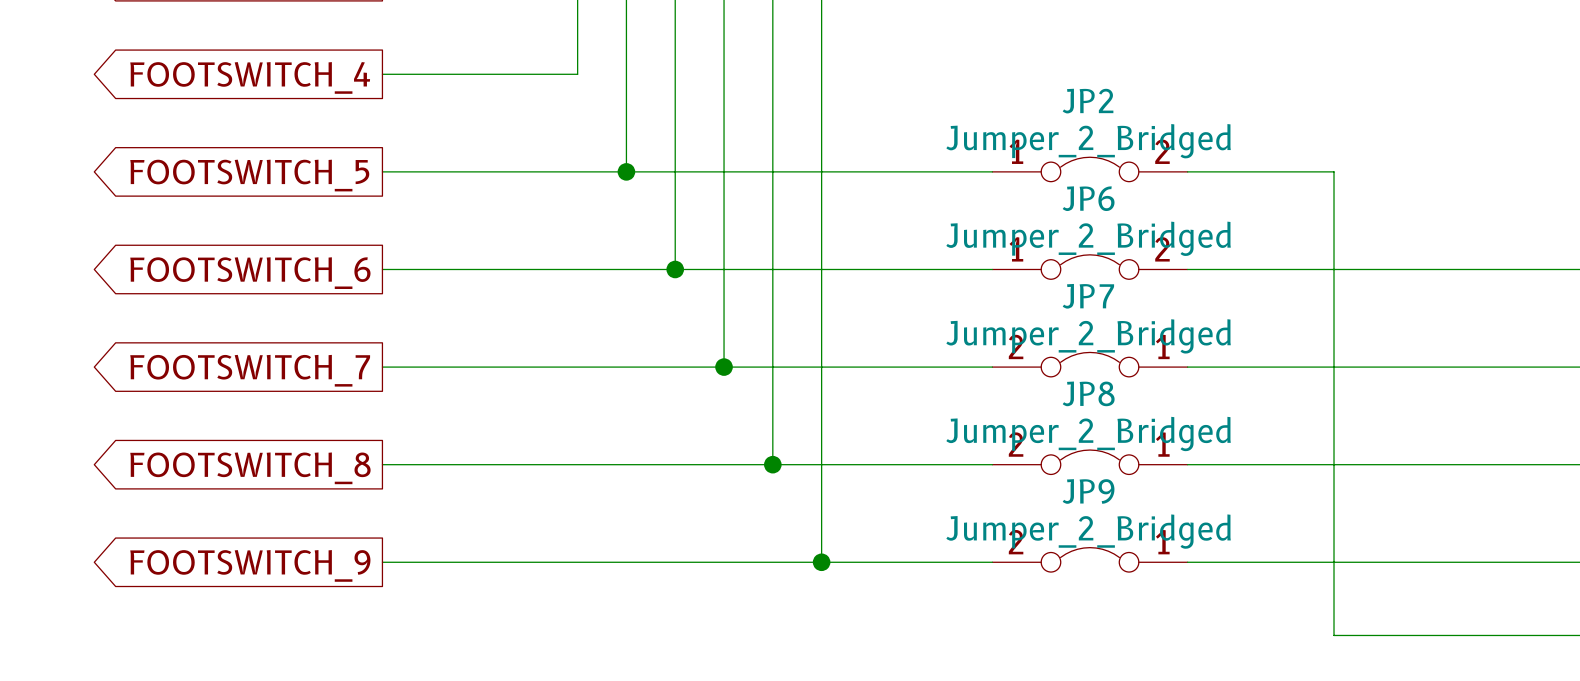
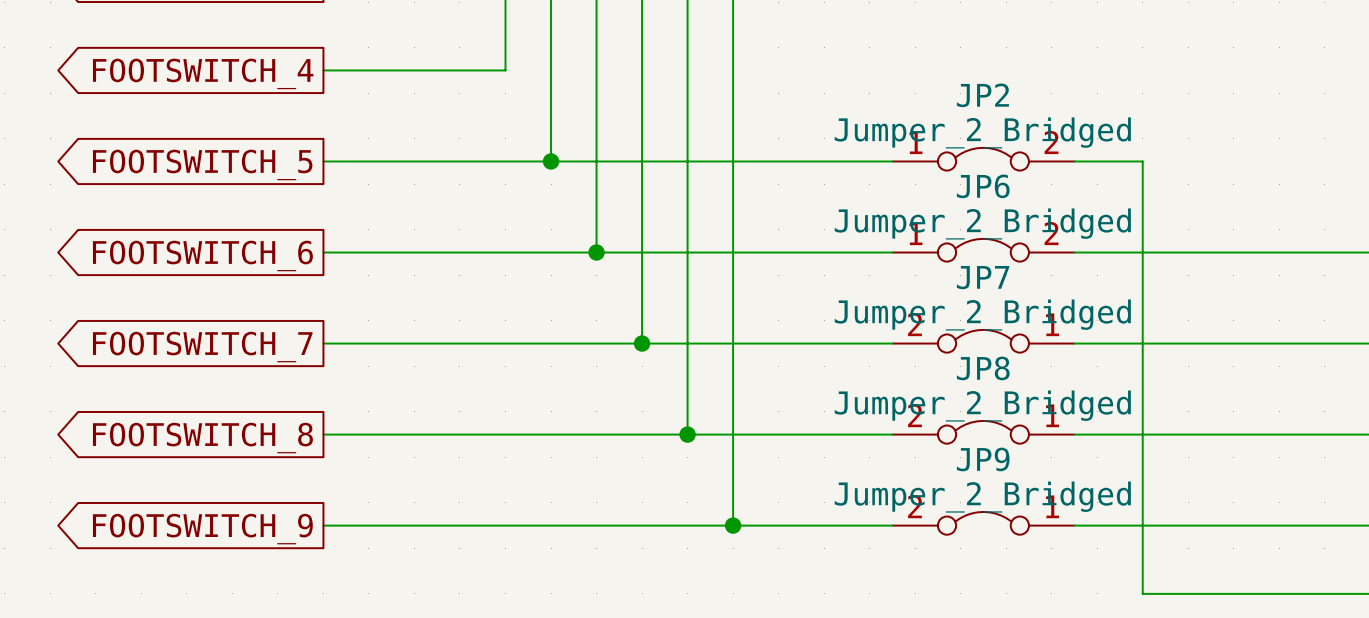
wire: (1260, 171) (1334, 171) (1334, 635) -> (1142, 161) (1142, 593) (1211, 593)

